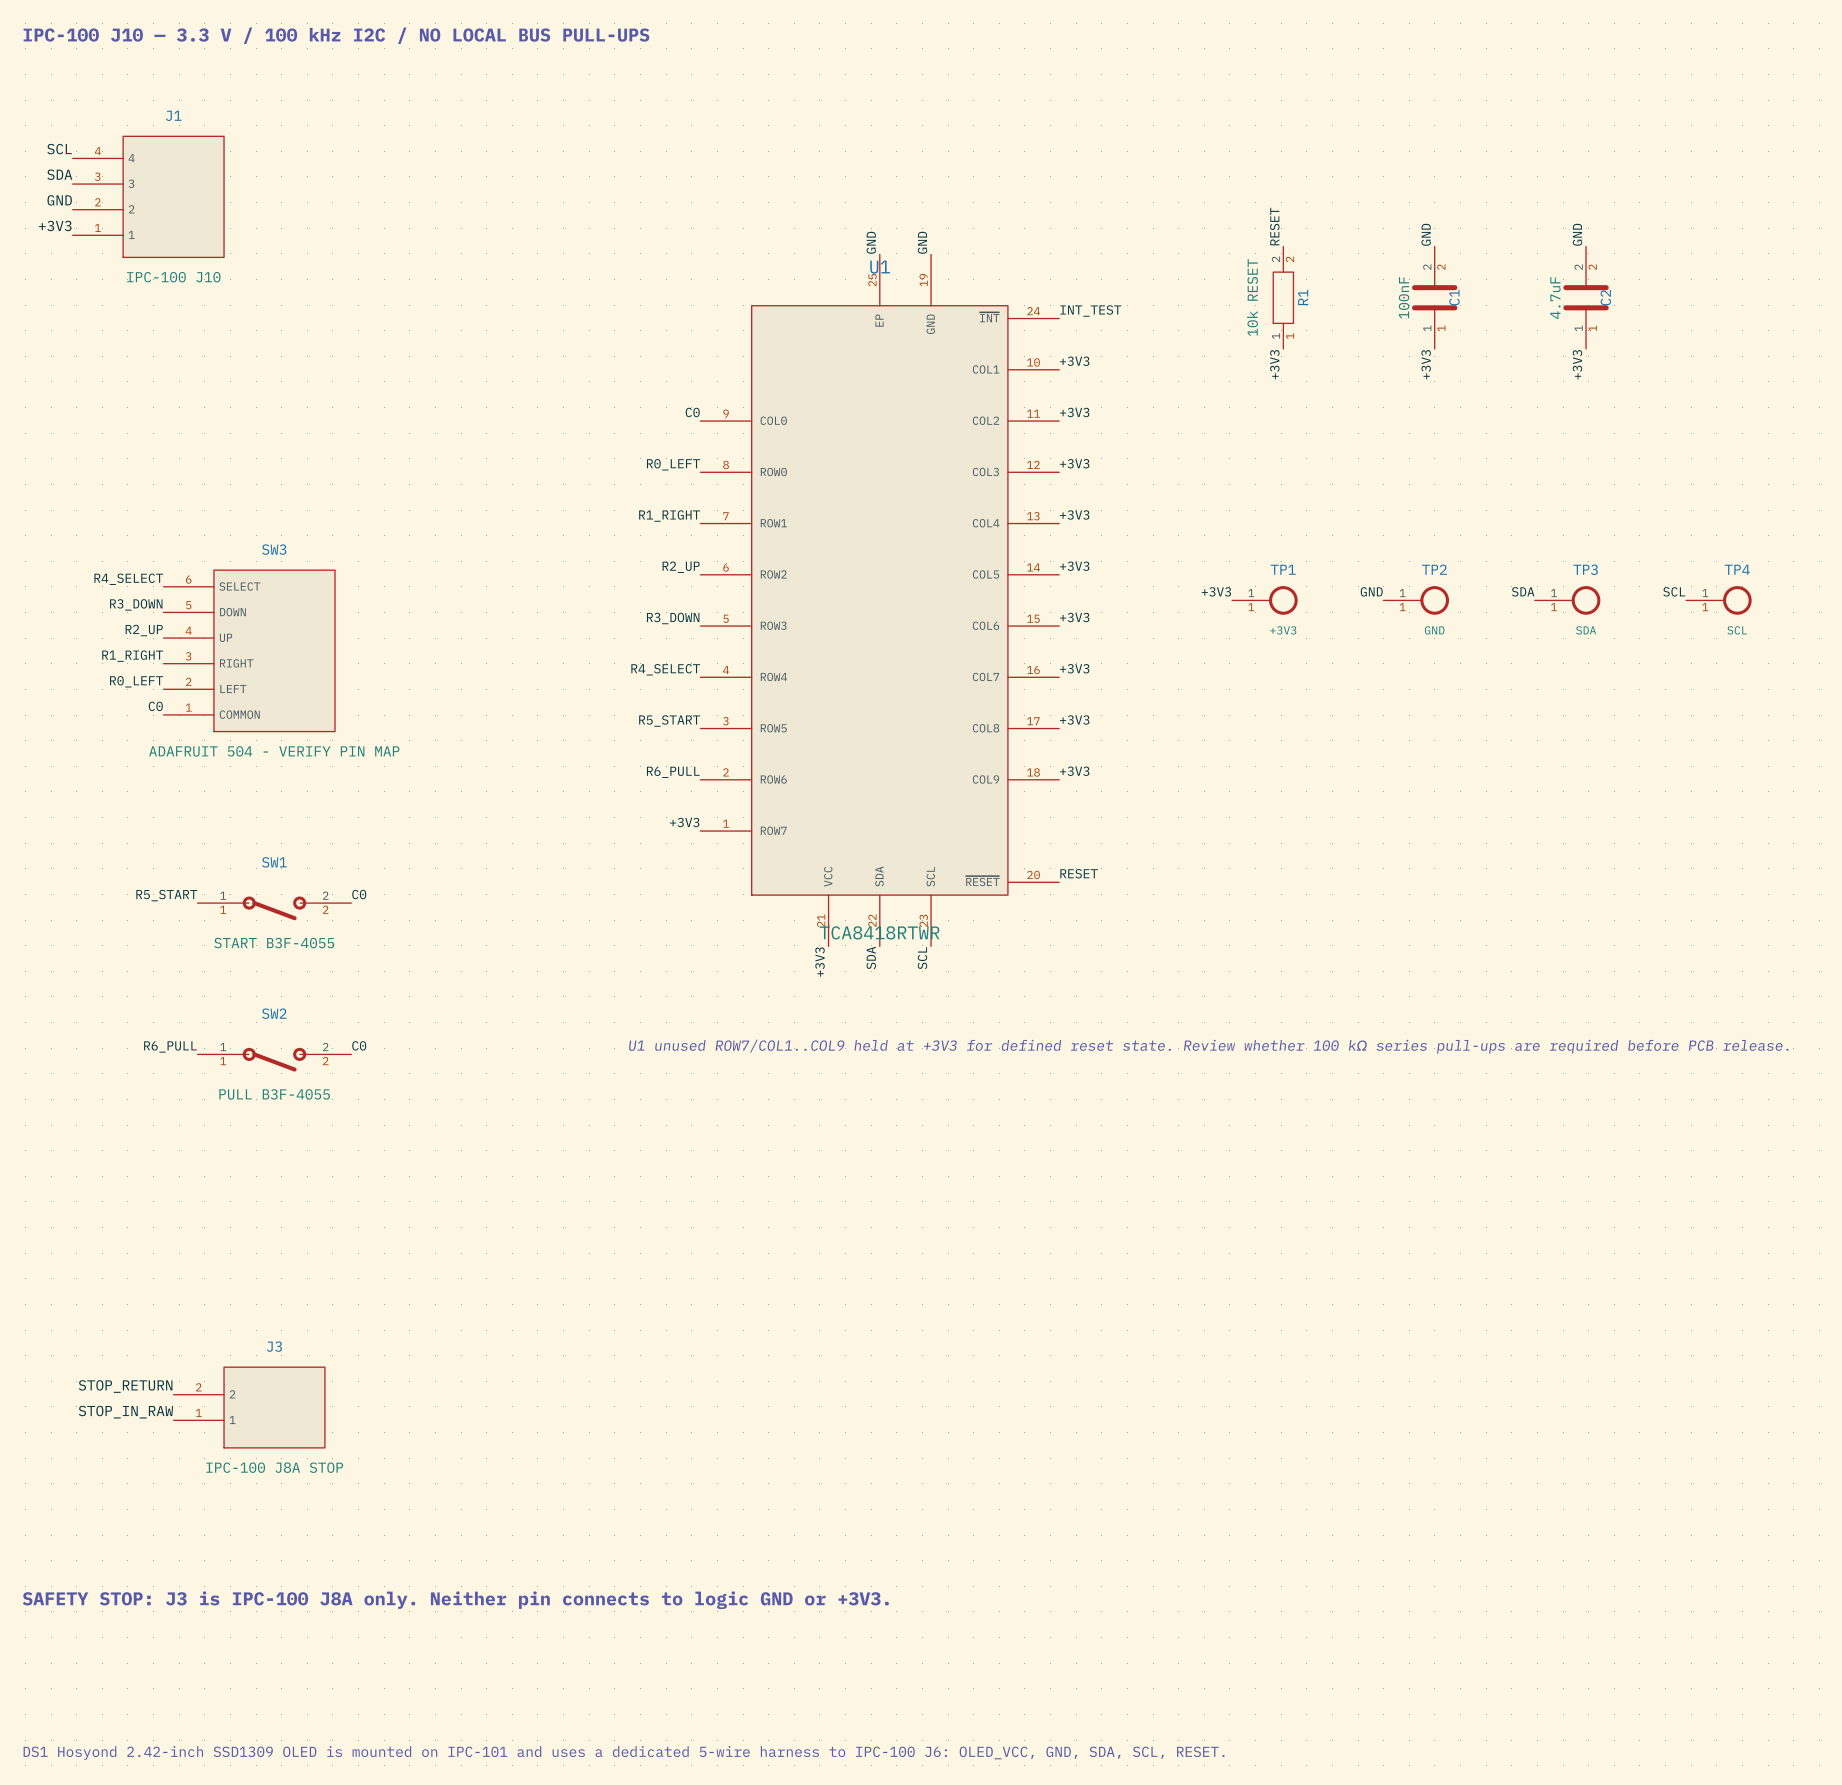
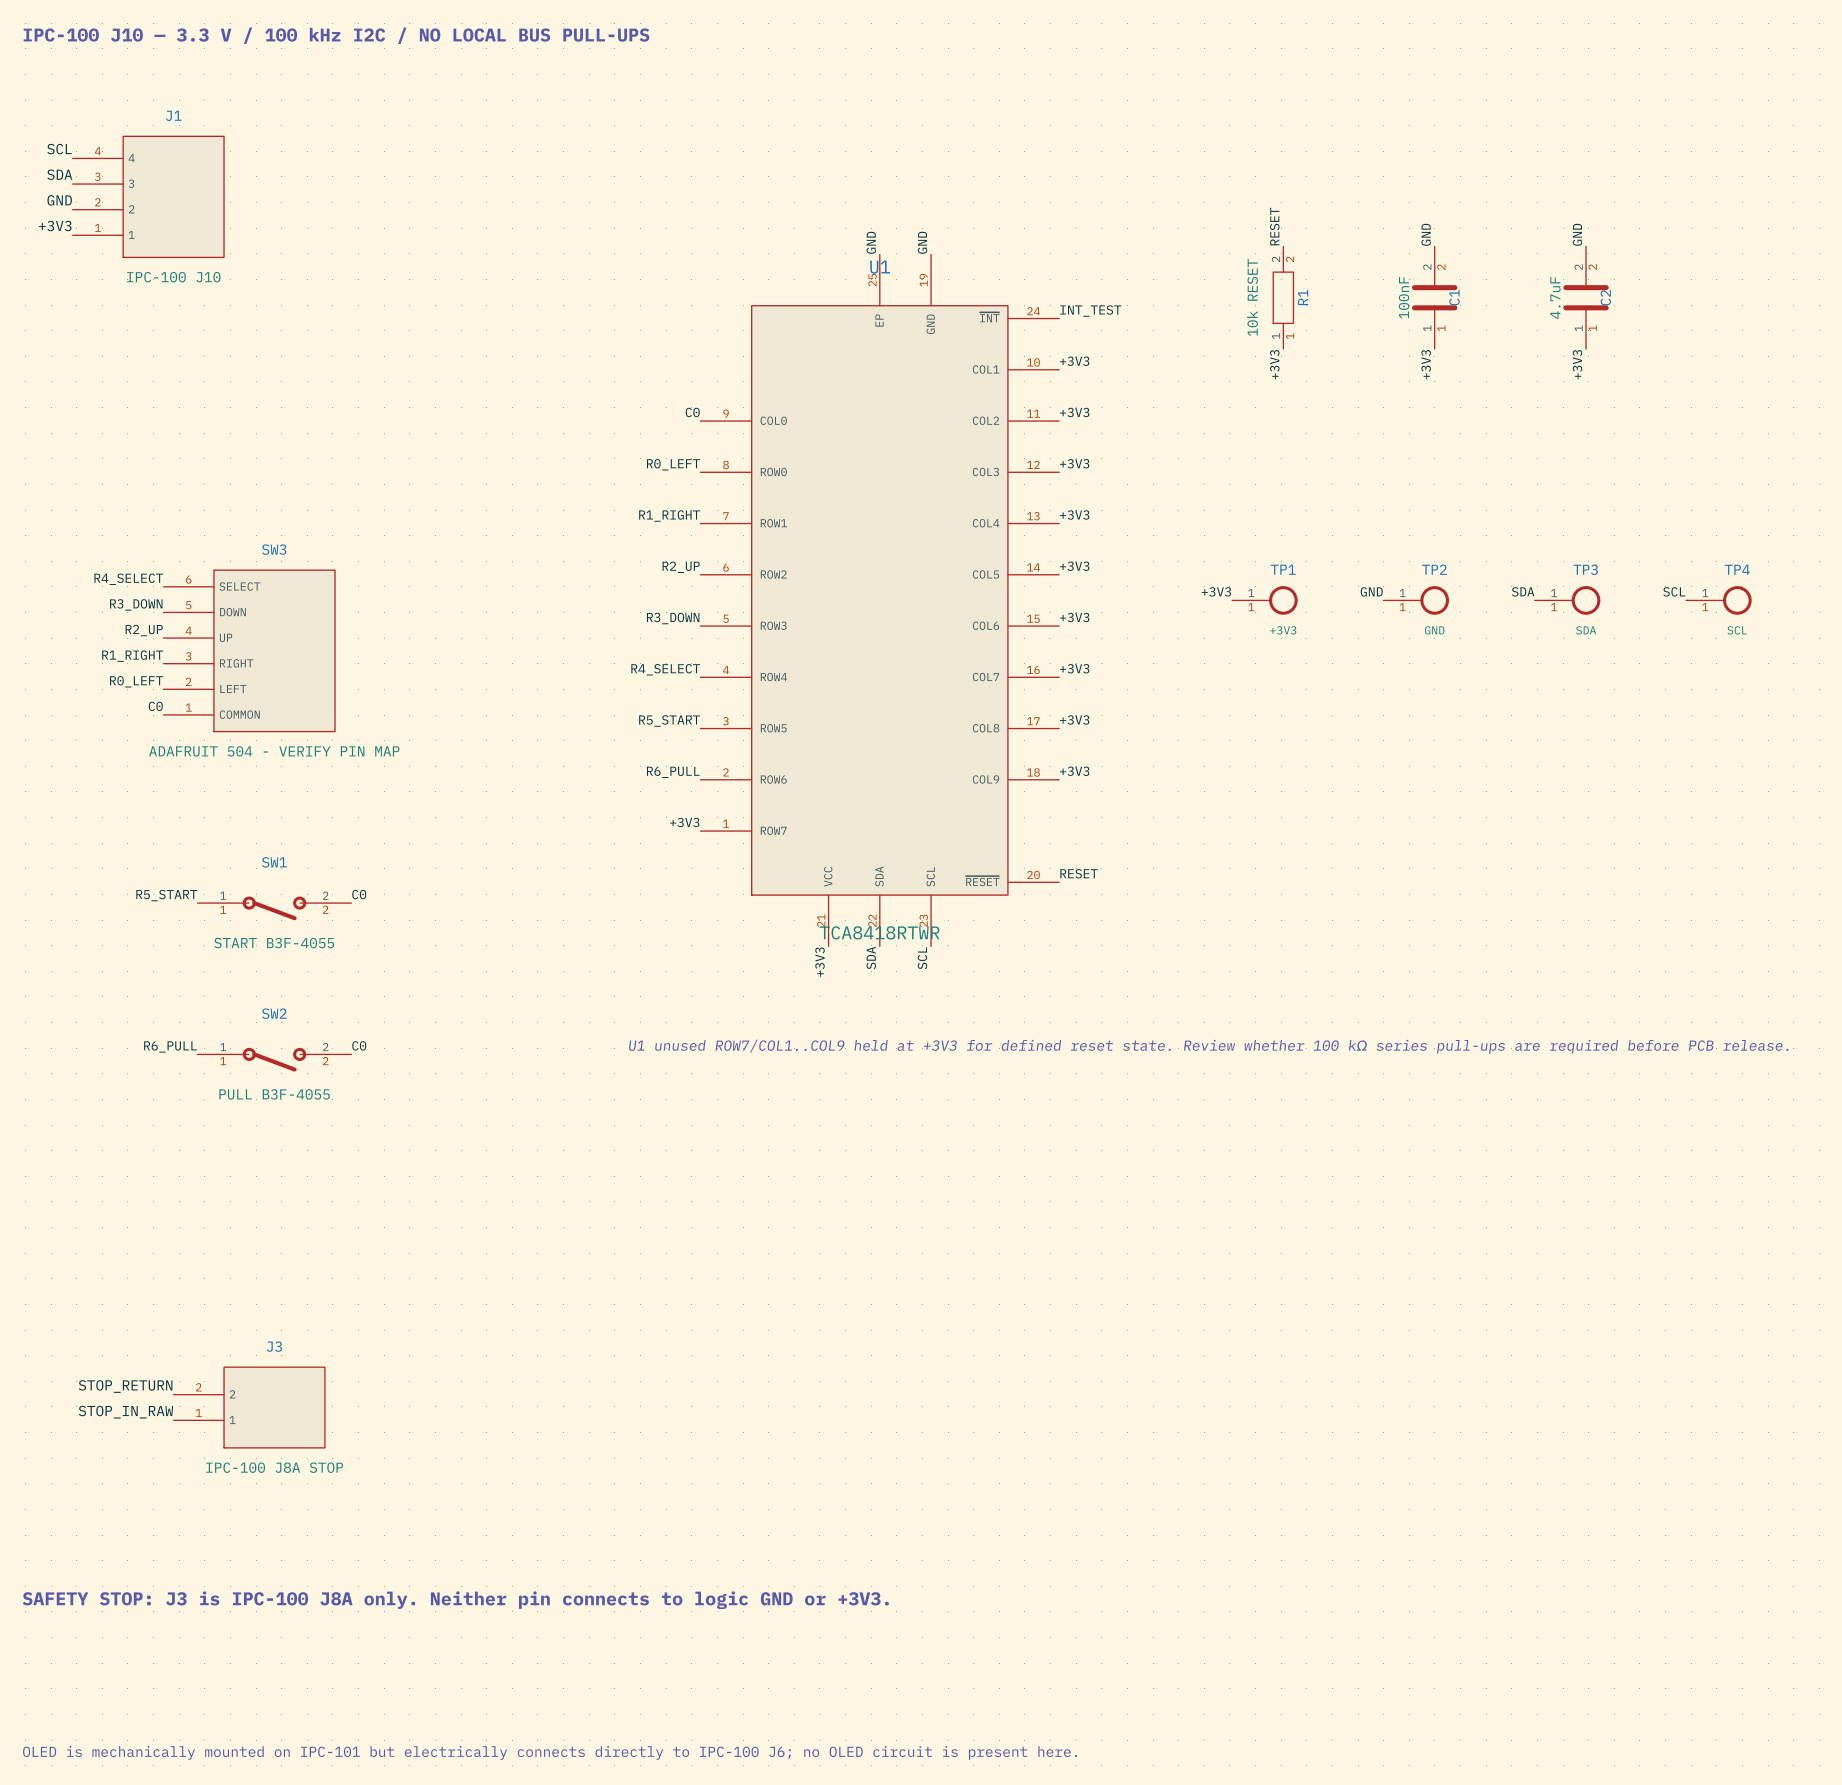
text: DS1 Hosyond 2.42-inch SSD1309 OLED is mounted on IPC-101 and uses a dedicated 5-wire harness to IPC-100 J6: OLED_VCC, GND, SDA, SCL, RESET. (624, 1752) -> OLED is mechanically mounted on IPC-101 but electrically connects directly to IPC-100 J6; no OLED circuit is present here. (550, 1752)

